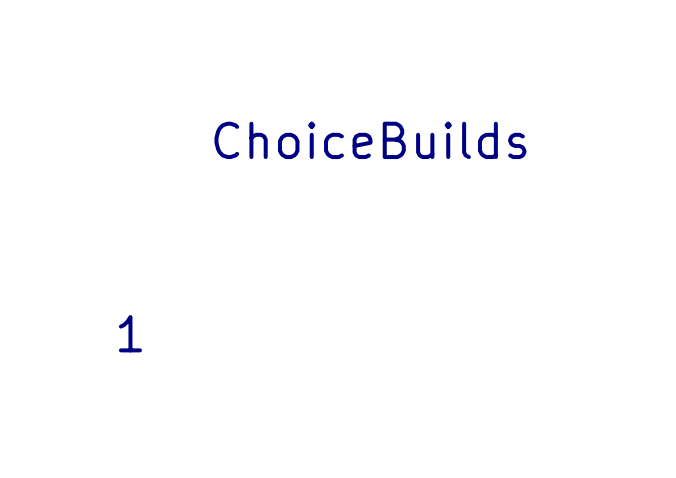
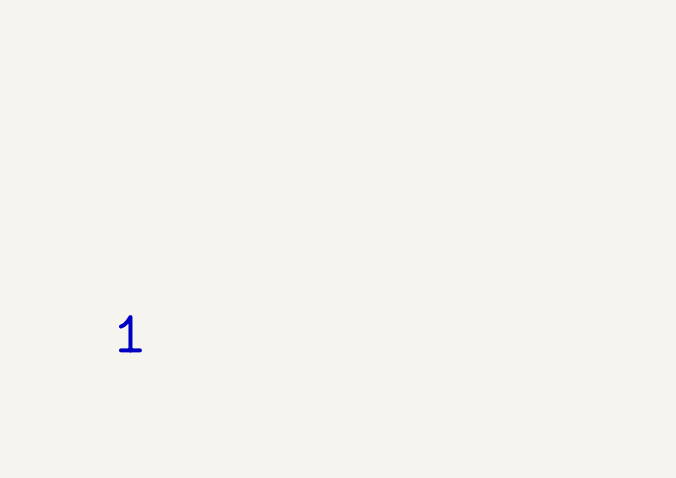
text: ChoiceBuilds (370, 140) -> none

